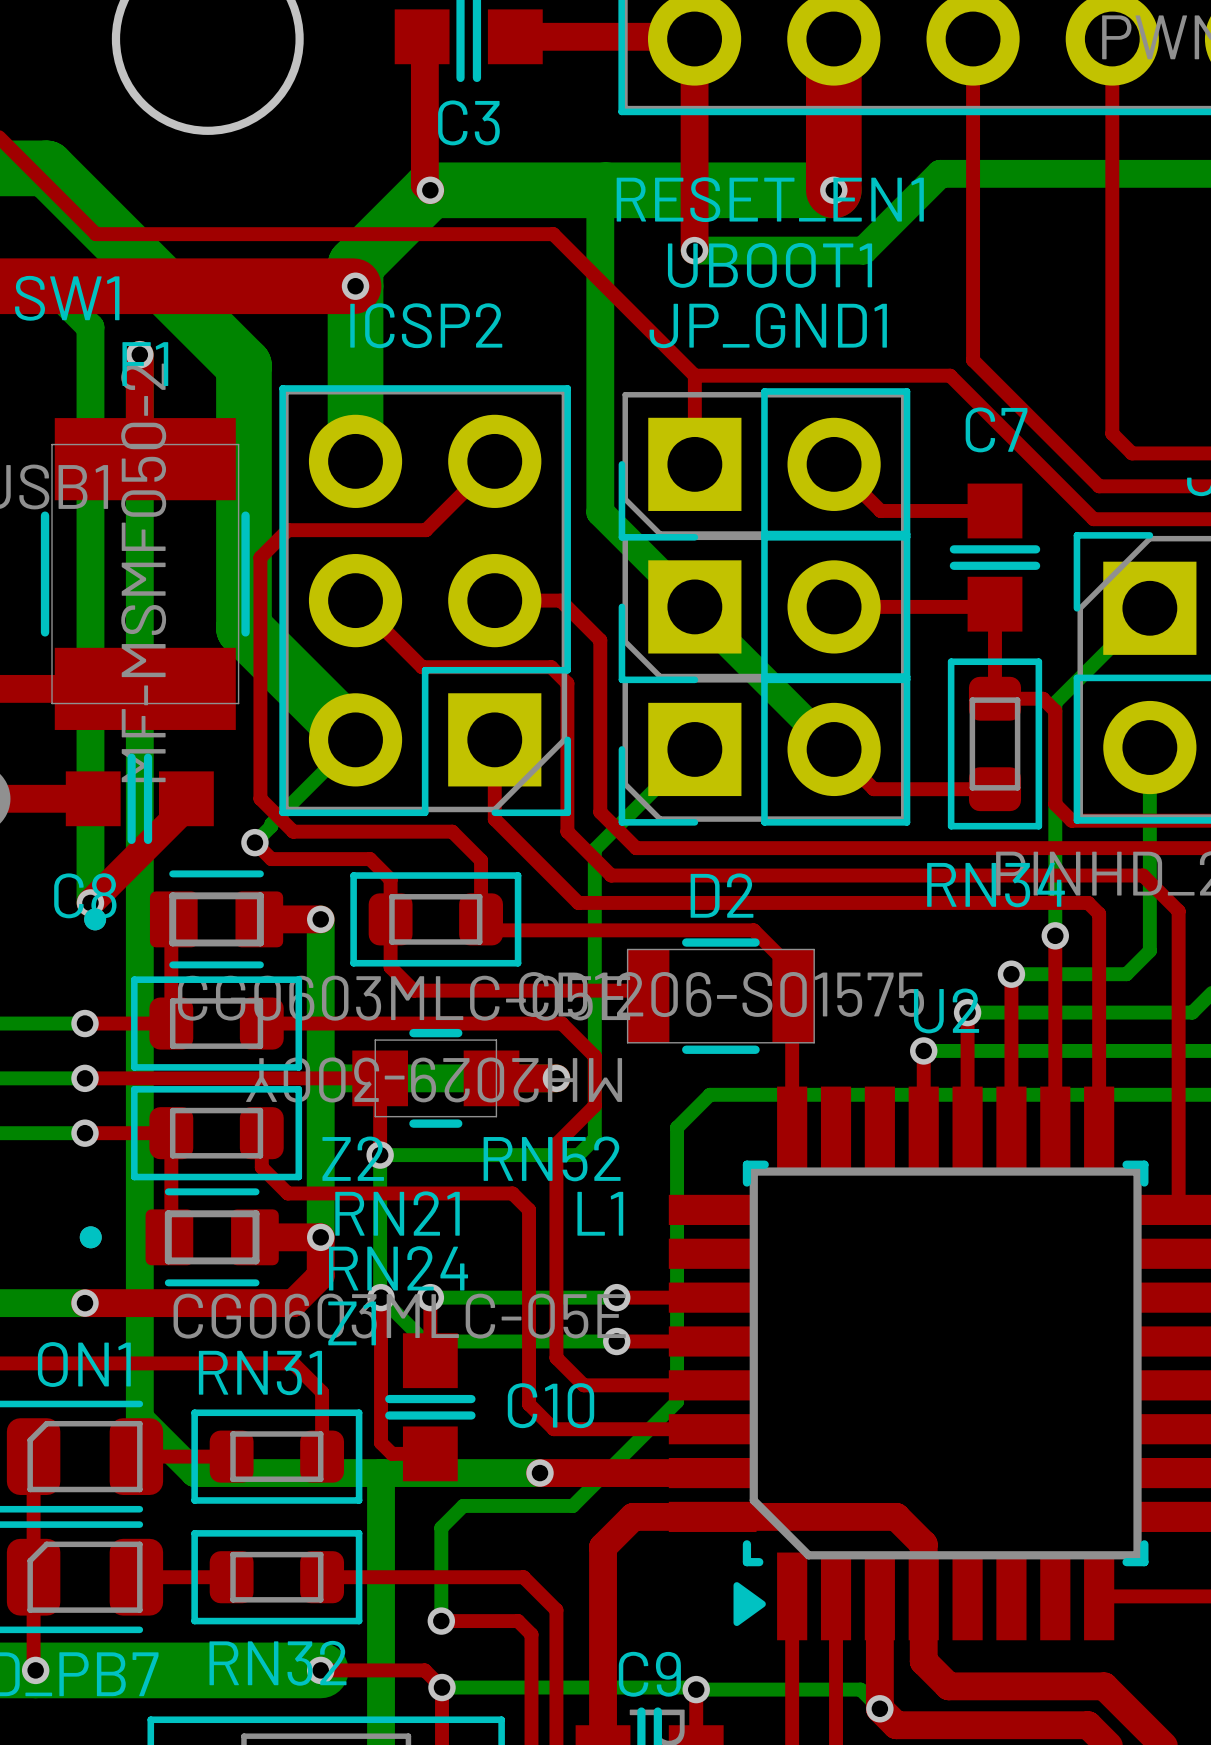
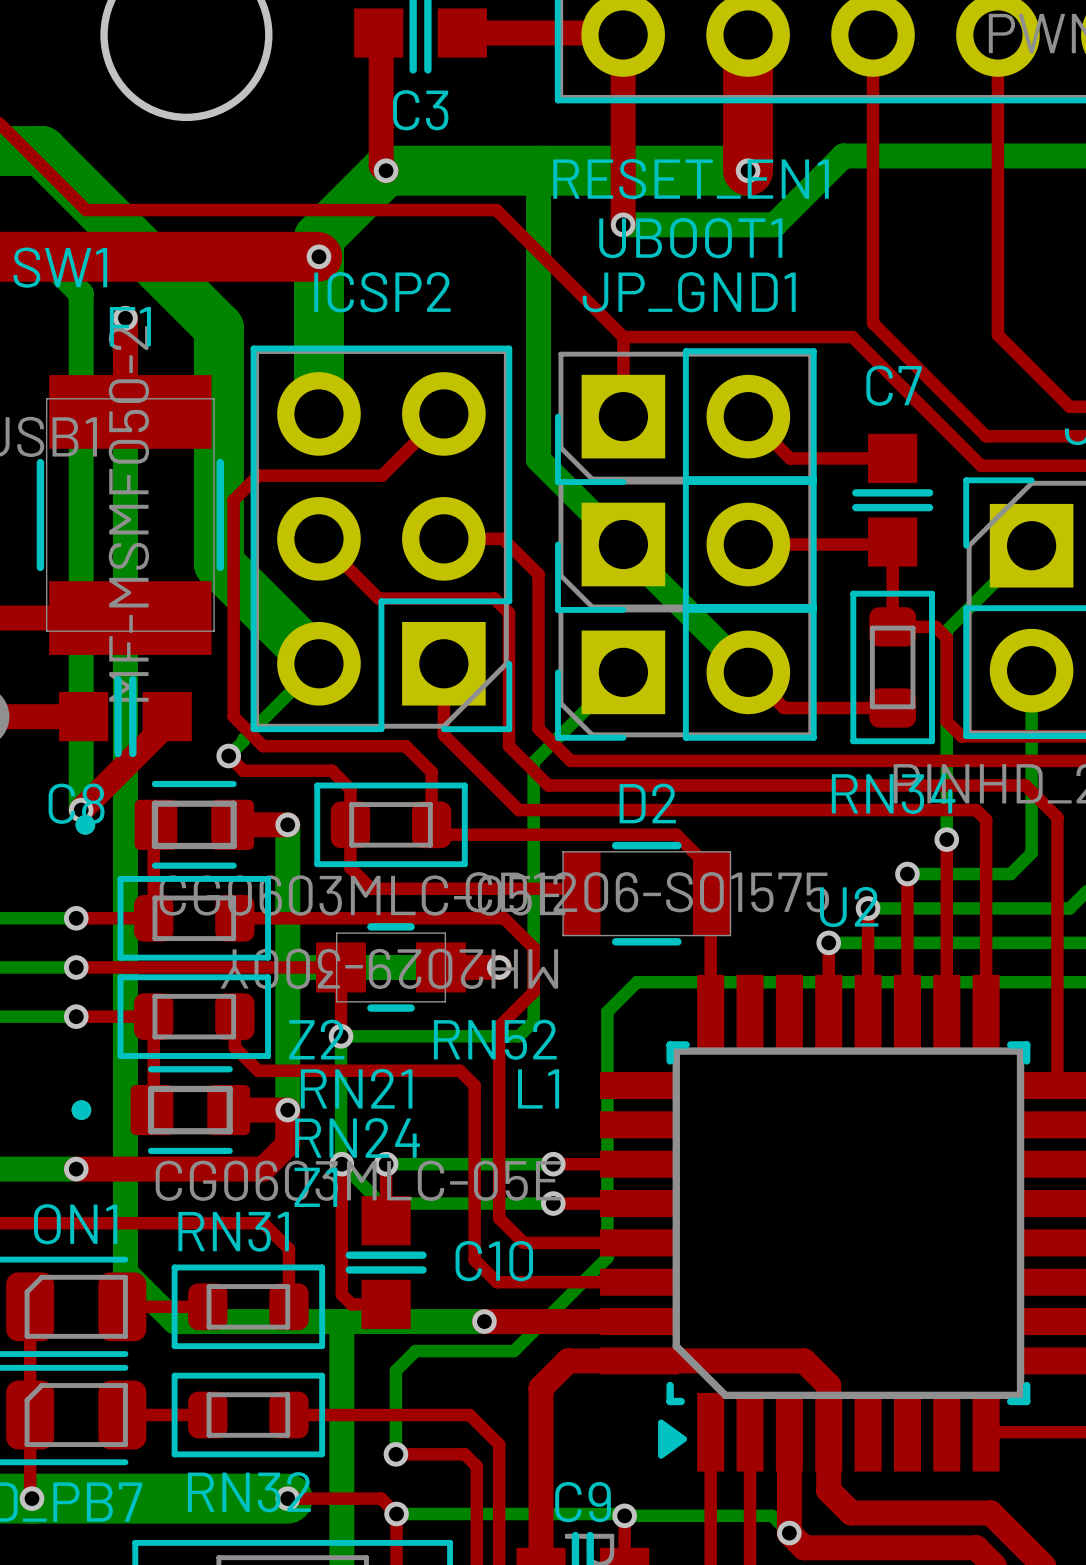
top track: (1112, 373) (1112, 433) (1132, 453) (1192, 453) -> (997, 334) (1069, 406)

